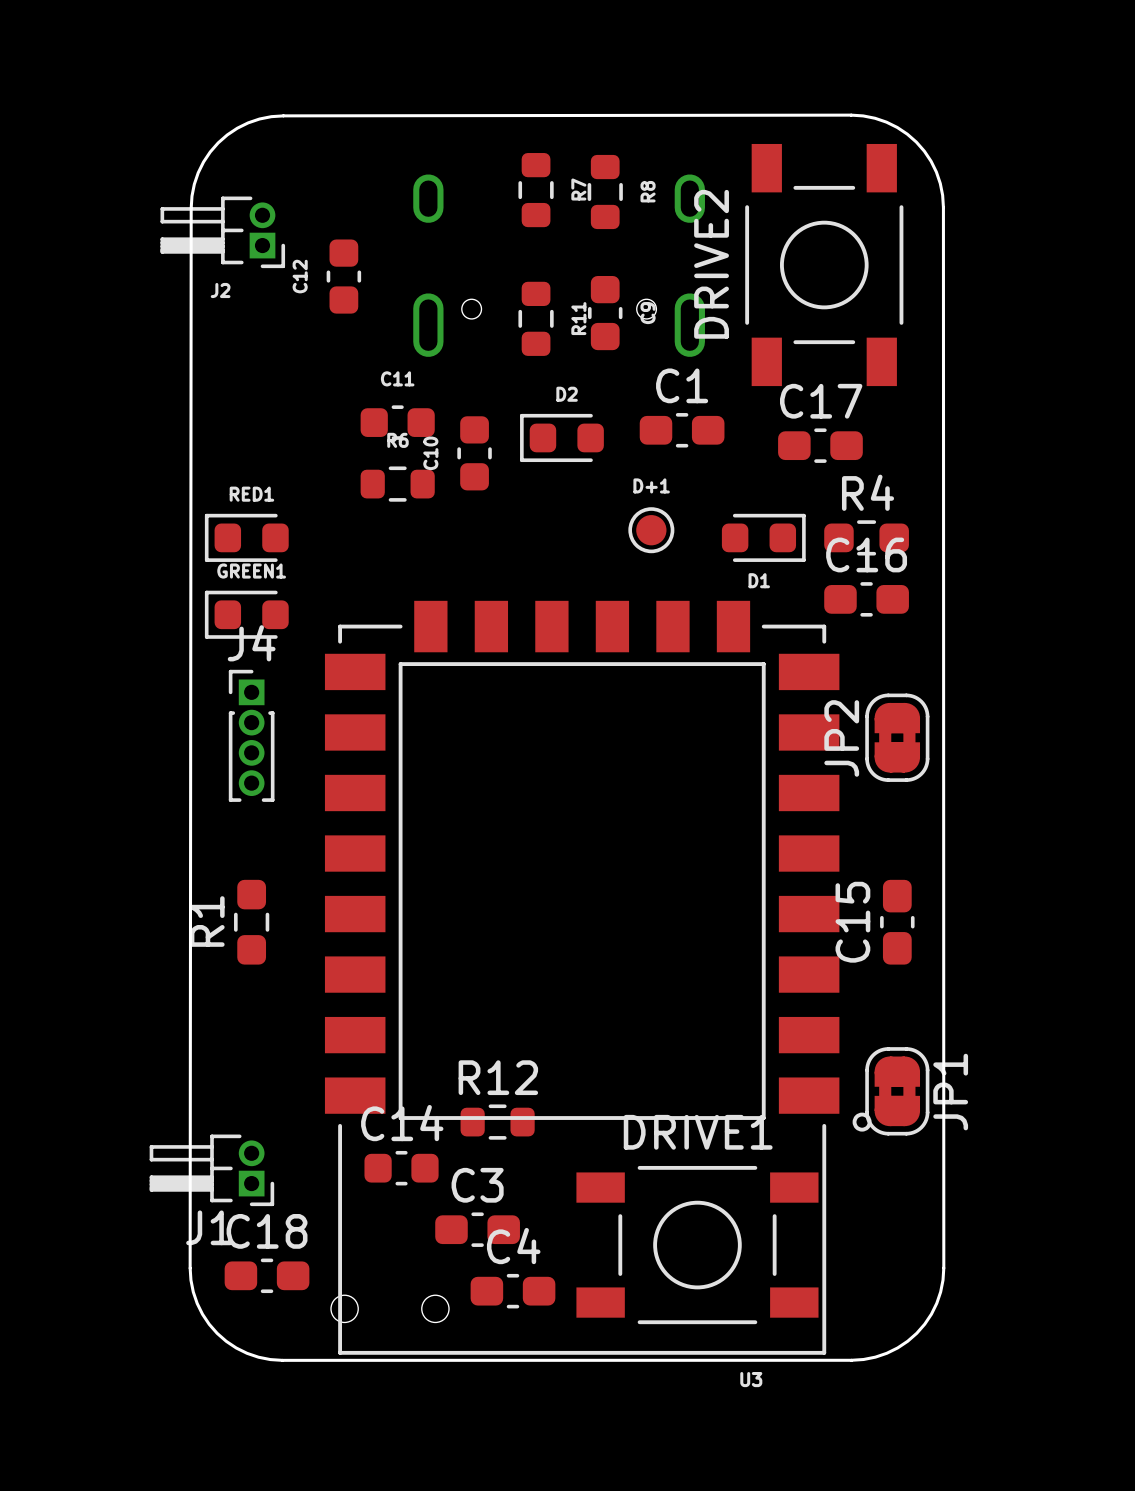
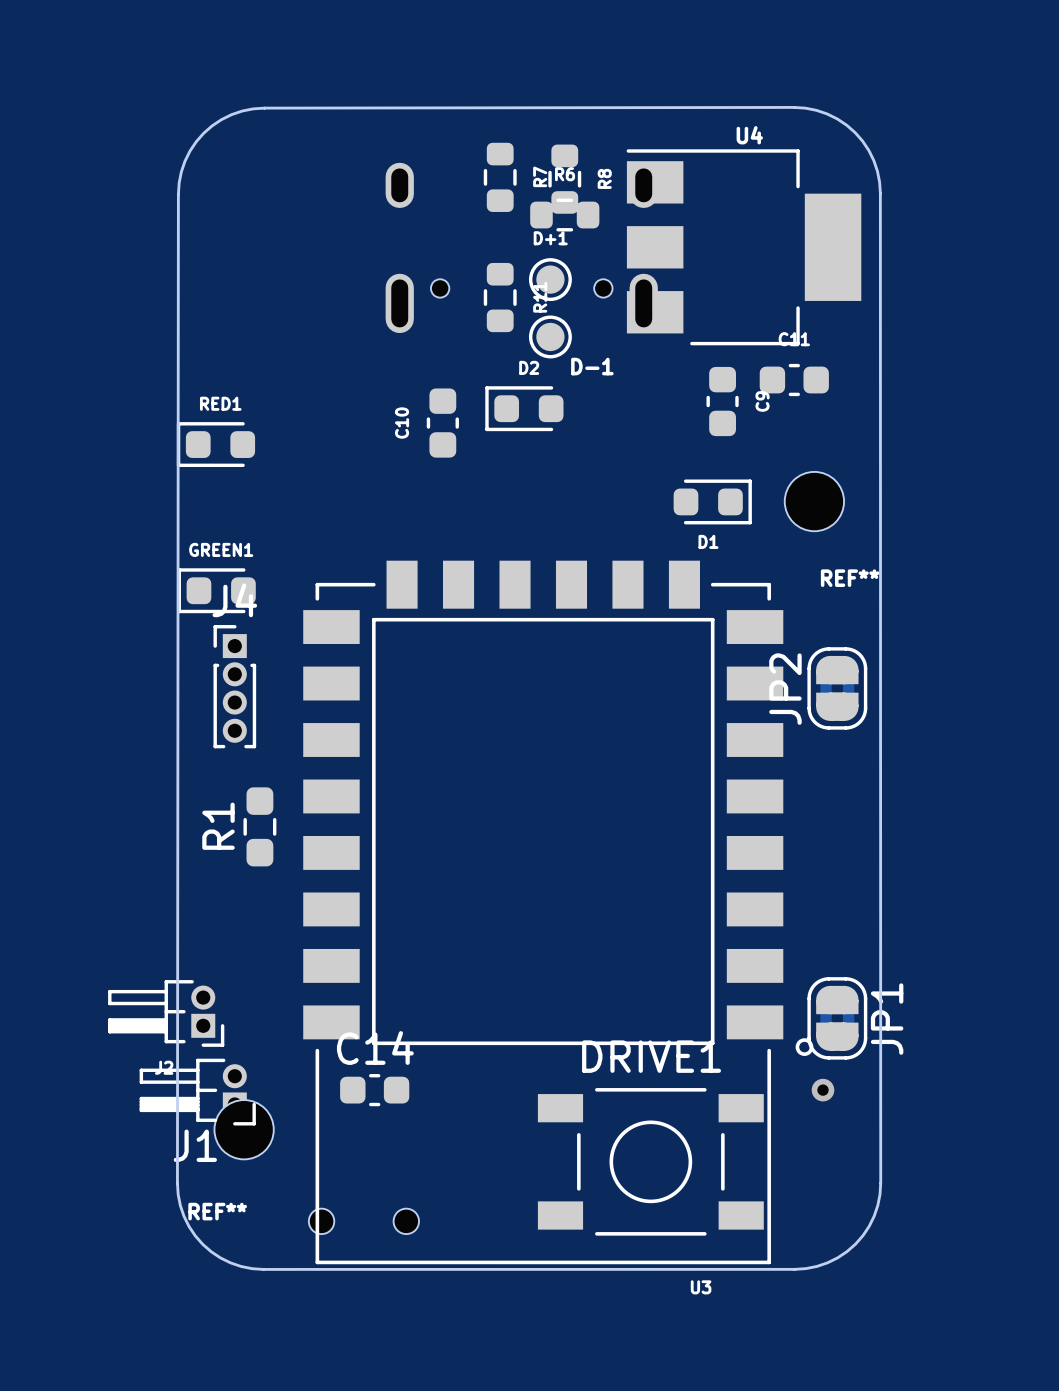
J2 position: (222, 232) -> (166, 1013)
U4: none -> (743, 247)
DRIVE2: (824, 265) -> none
C12: (343, 276) -> none
C9 position: (605, 313) -> (722, 401)
D-1: none -> (550, 336)
C11 position: (397, 422) -> (794, 380)
C1: (682, 430) -> none
C17: (820, 445) -> none
R6 position: (397, 484) -> (564, 215)
D+1 position: (651, 530) -> (550, 279)
RED1 position: (246, 537) -> (215, 444)
R4: (866, 537) -> none
REF**: none -> (814, 501)
C16: (866, 599) -> none
GREEN1 position: (246, 614) -> (216, 590)
R1 position: (251, 922) -> (259, 826)
C15: (897, 922) -> none
R12: (497, 1122) -> none
via: none -> (823, 1090)
REF**: none -> (244, 1129)
C3: (477, 1229) -> none
C18: (267, 1275) -> none
C4: (512, 1291) -> none

